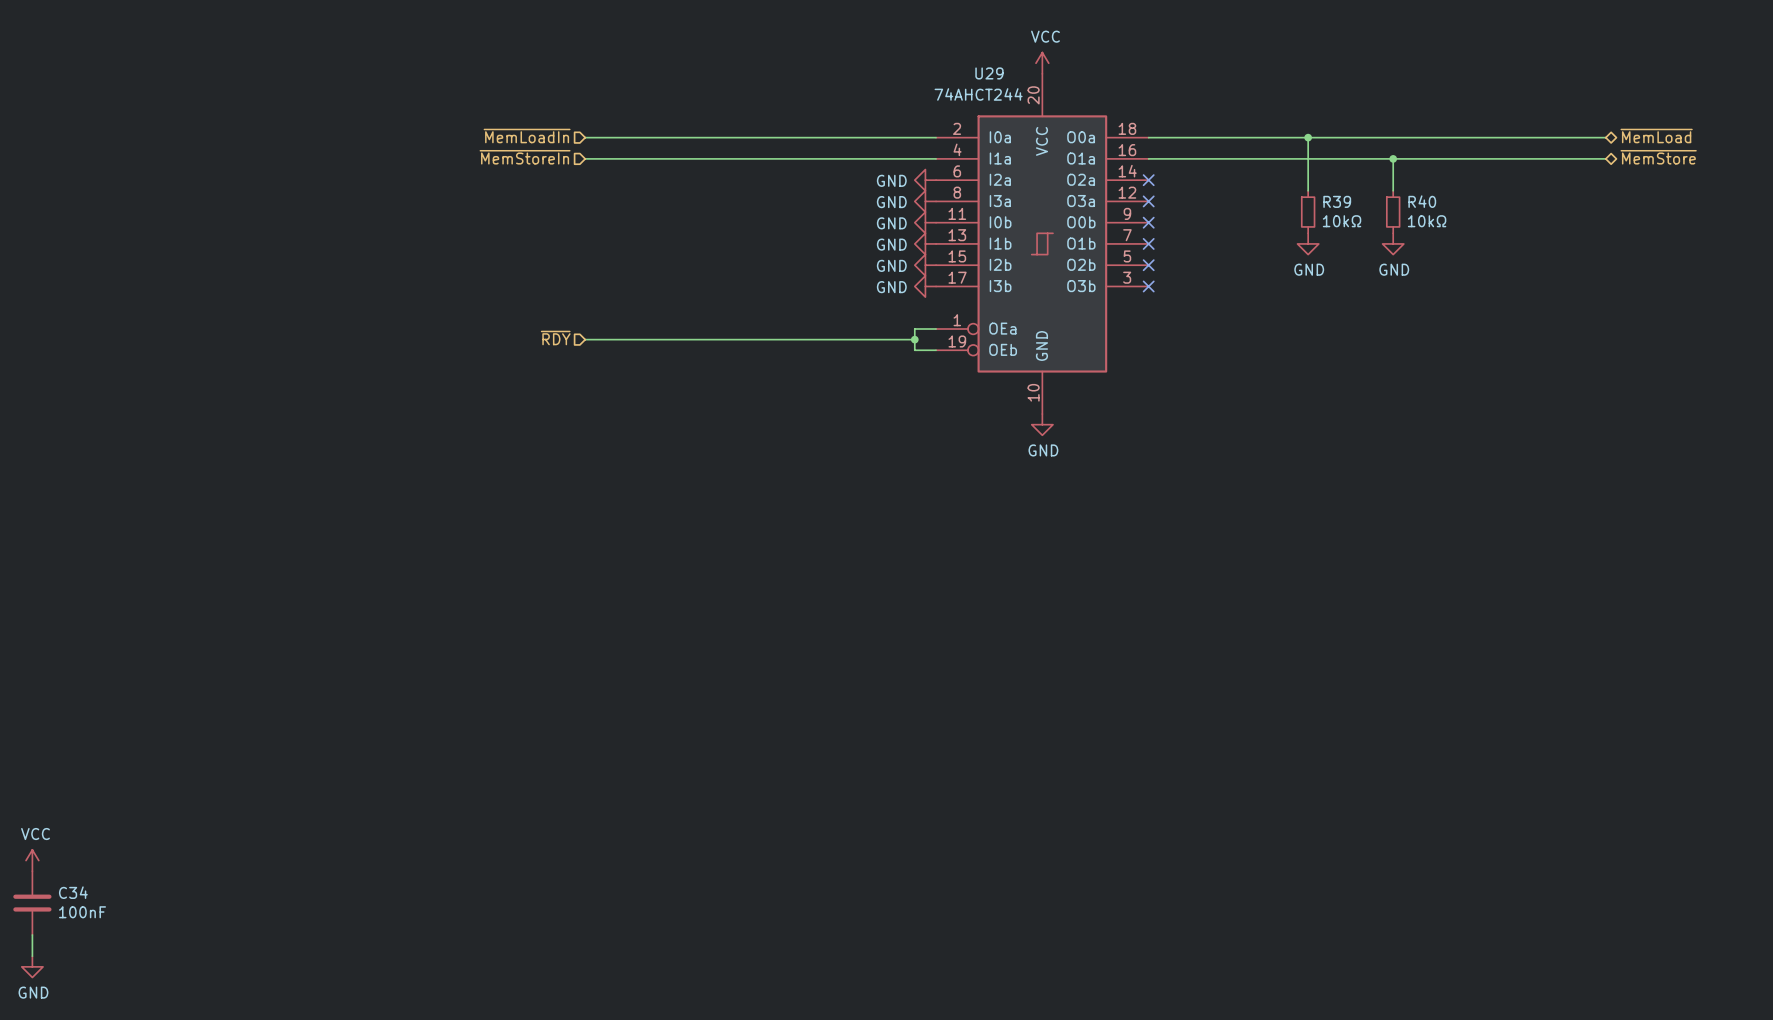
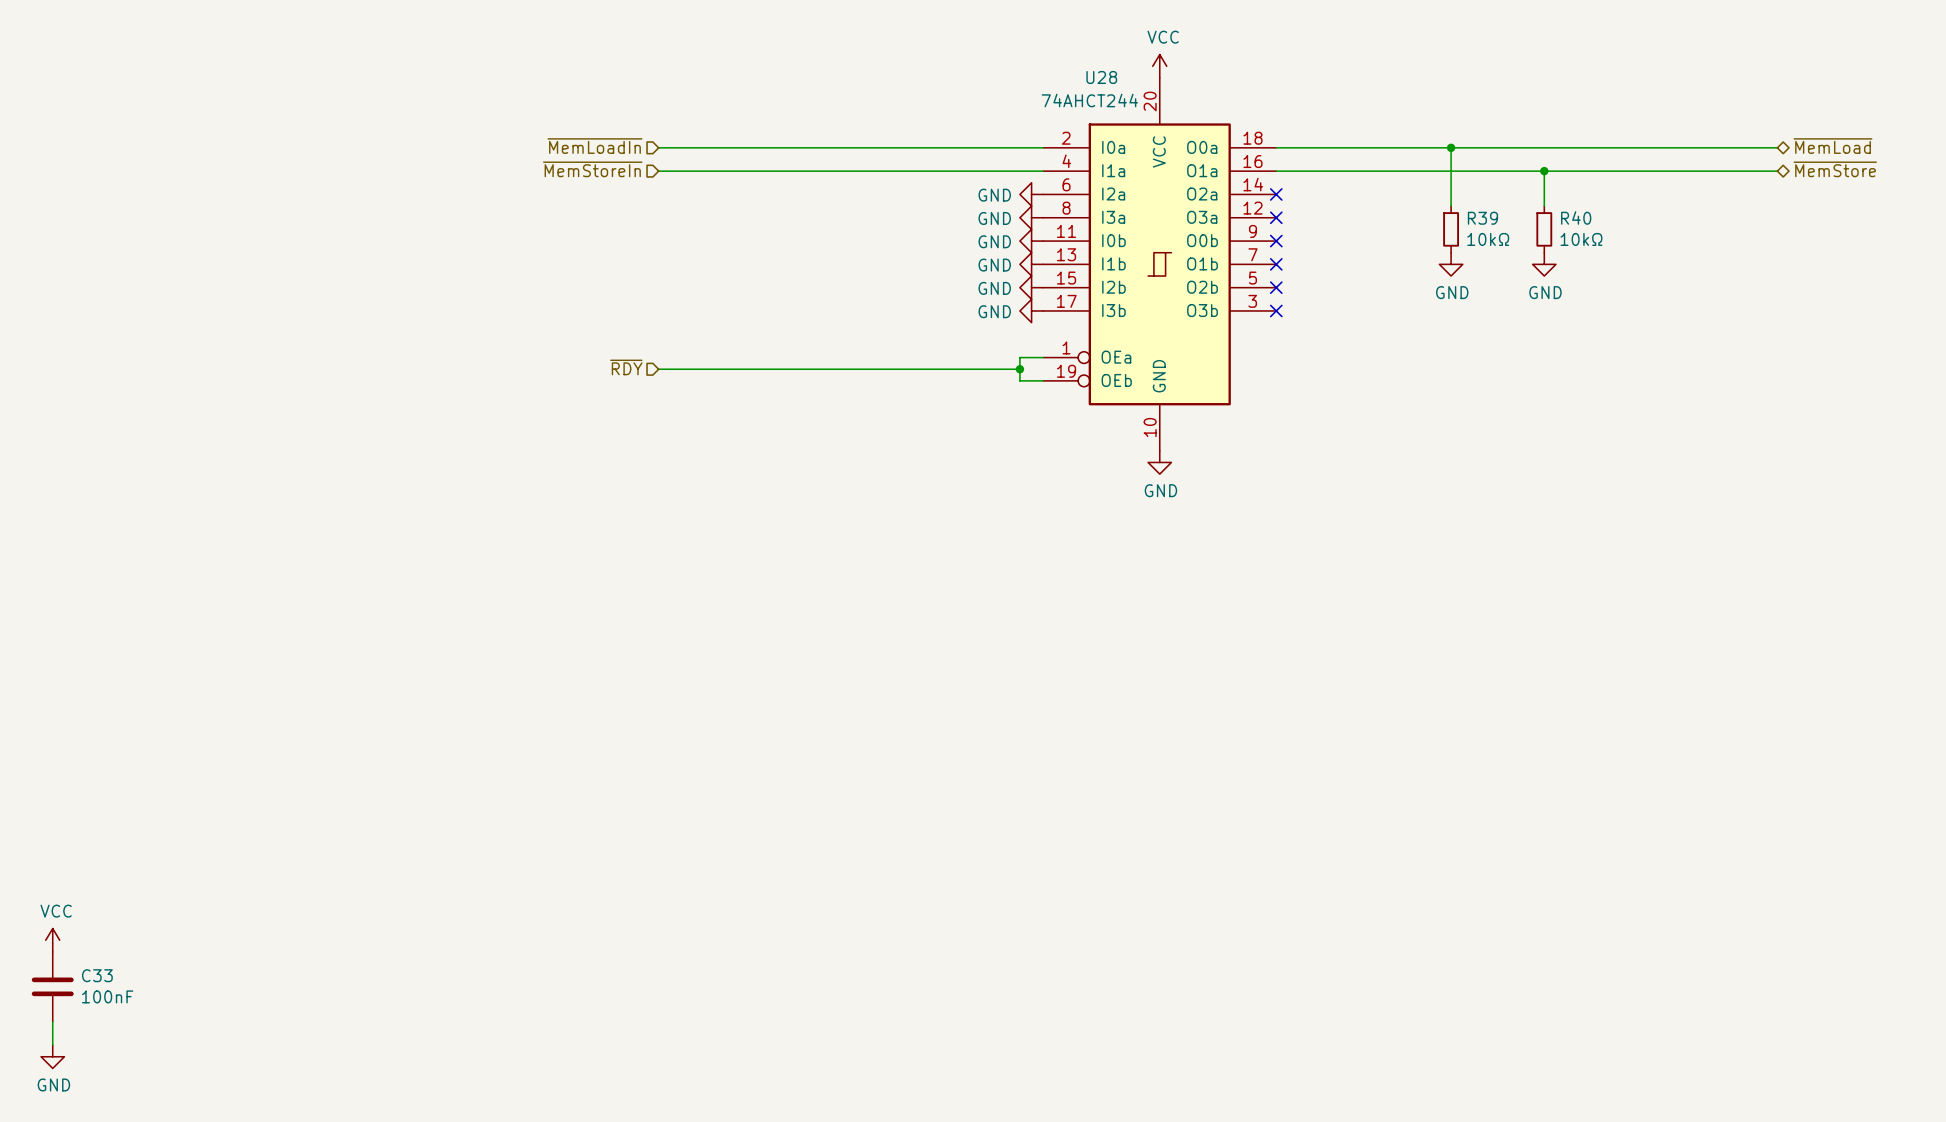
U29 name: U29 (989, 73) -> U28 (1101, 77)
C34 name: C34 (73, 892) -> C33 (97, 975)

